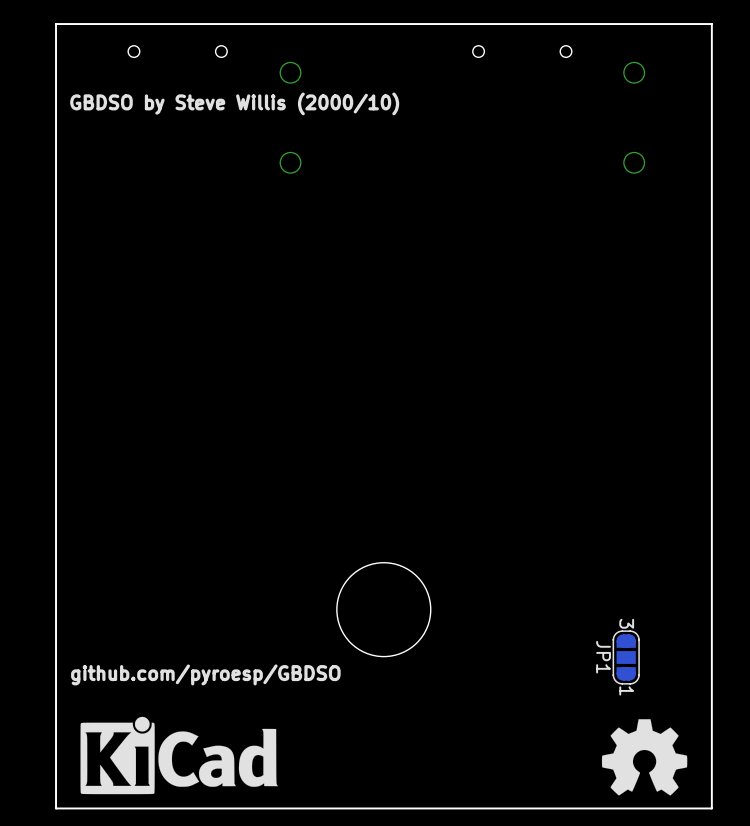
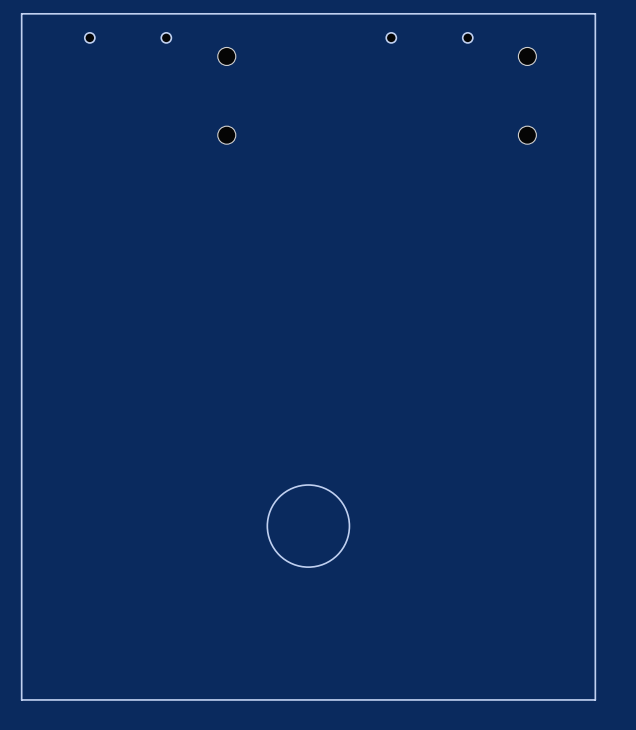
text: GBDSO by Steve Willis (2000/10) (234, 103) -> none
JP1: (626, 657) -> none
text: github.com/pyroesp/GBDSO (205, 674) -> none
drawing: [80, 716, 278, 795] -> none
drawing: [601, 719, 688, 796] -> none

